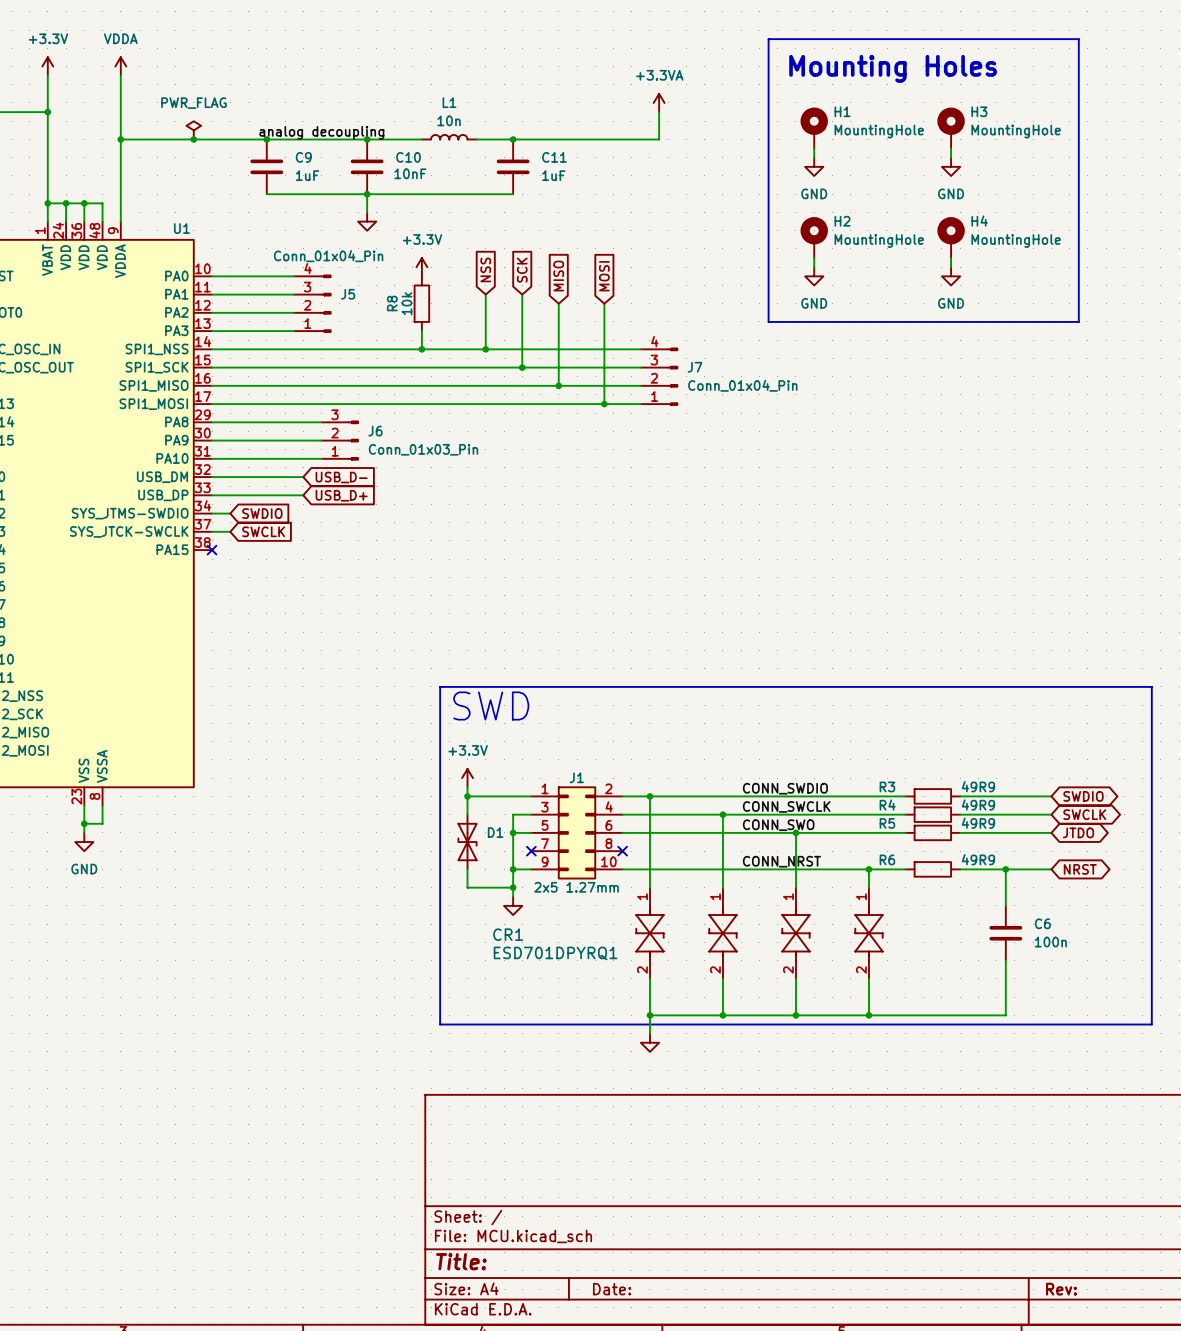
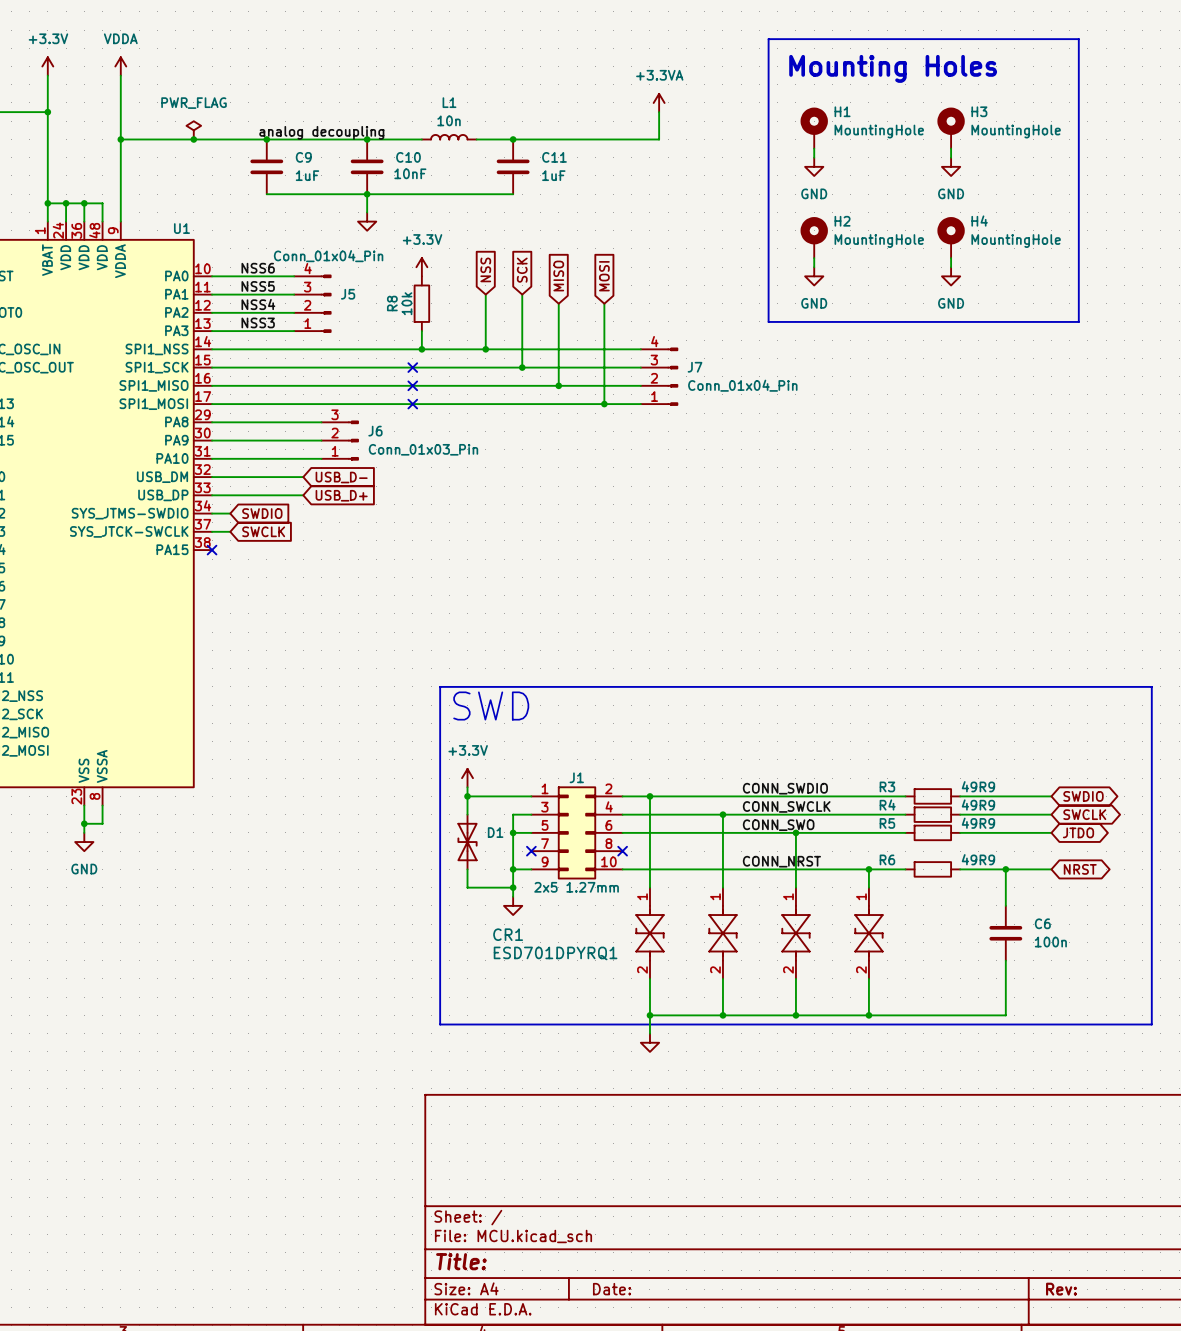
label: none -> NSS6 (258, 268)
label: none -> NSS5 (258, 286)
label: none -> NSS4 (258, 304)
label: none -> NSS3 (258, 322)
no-connect mark: none -> (412, 367)
no-connect mark: none -> (412, 385)
no-connect mark: none -> (412, 404)

